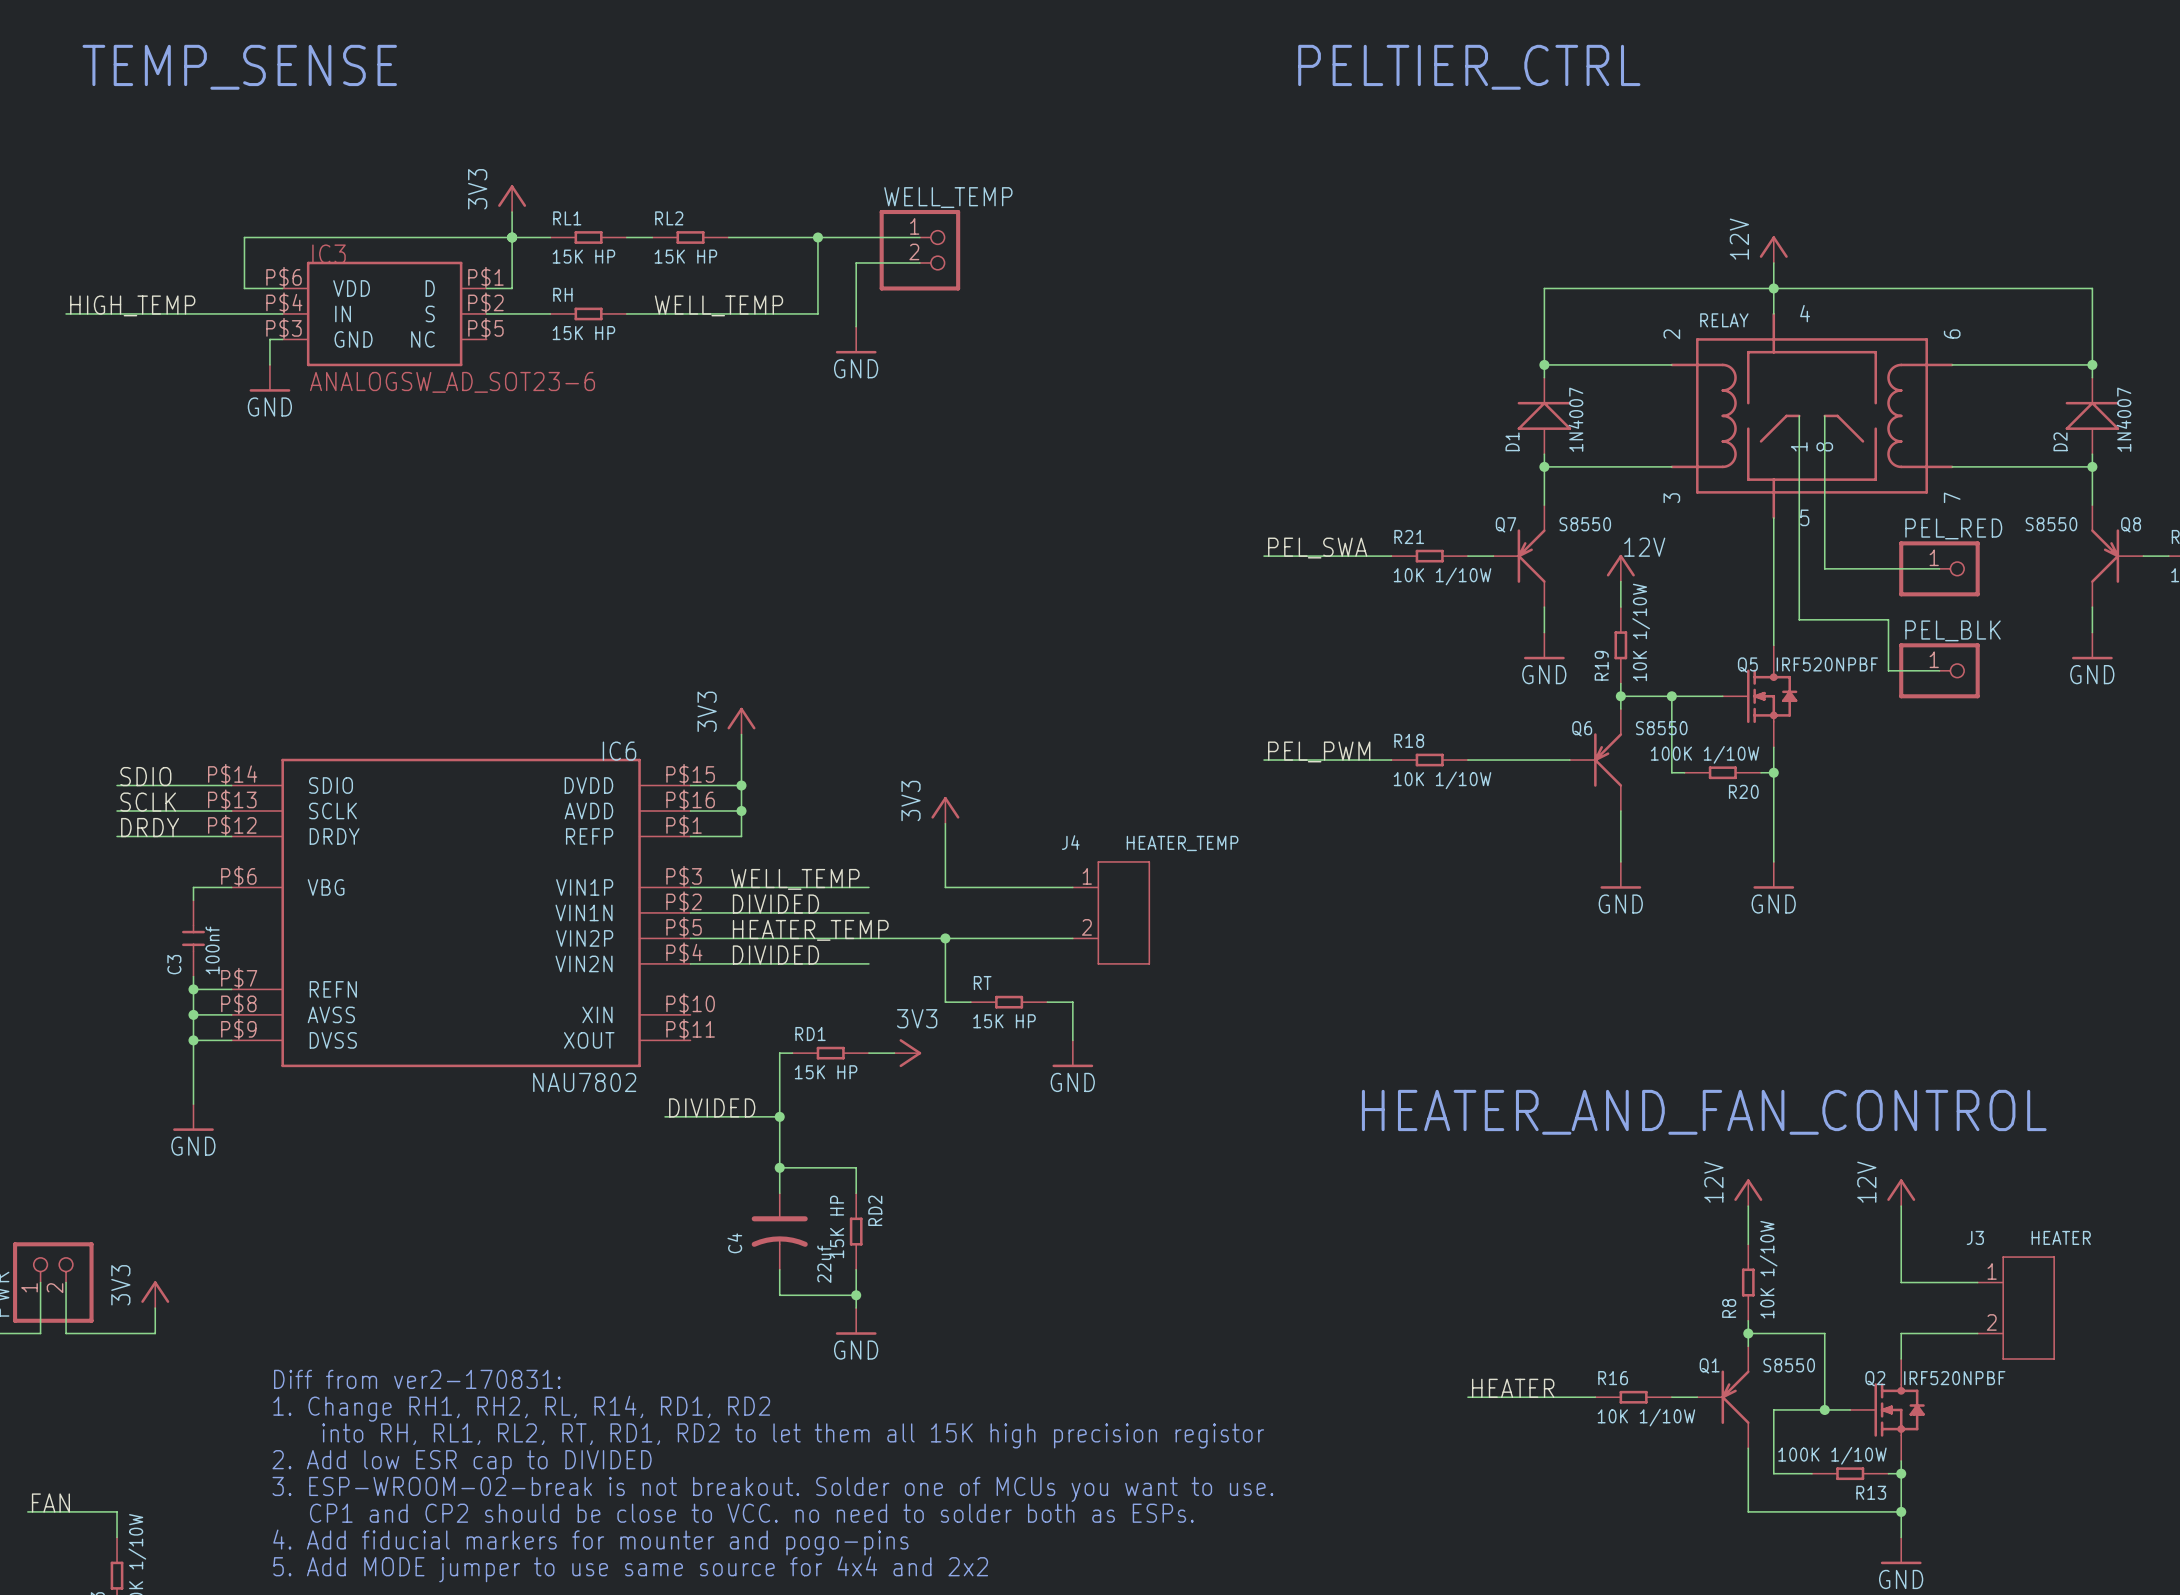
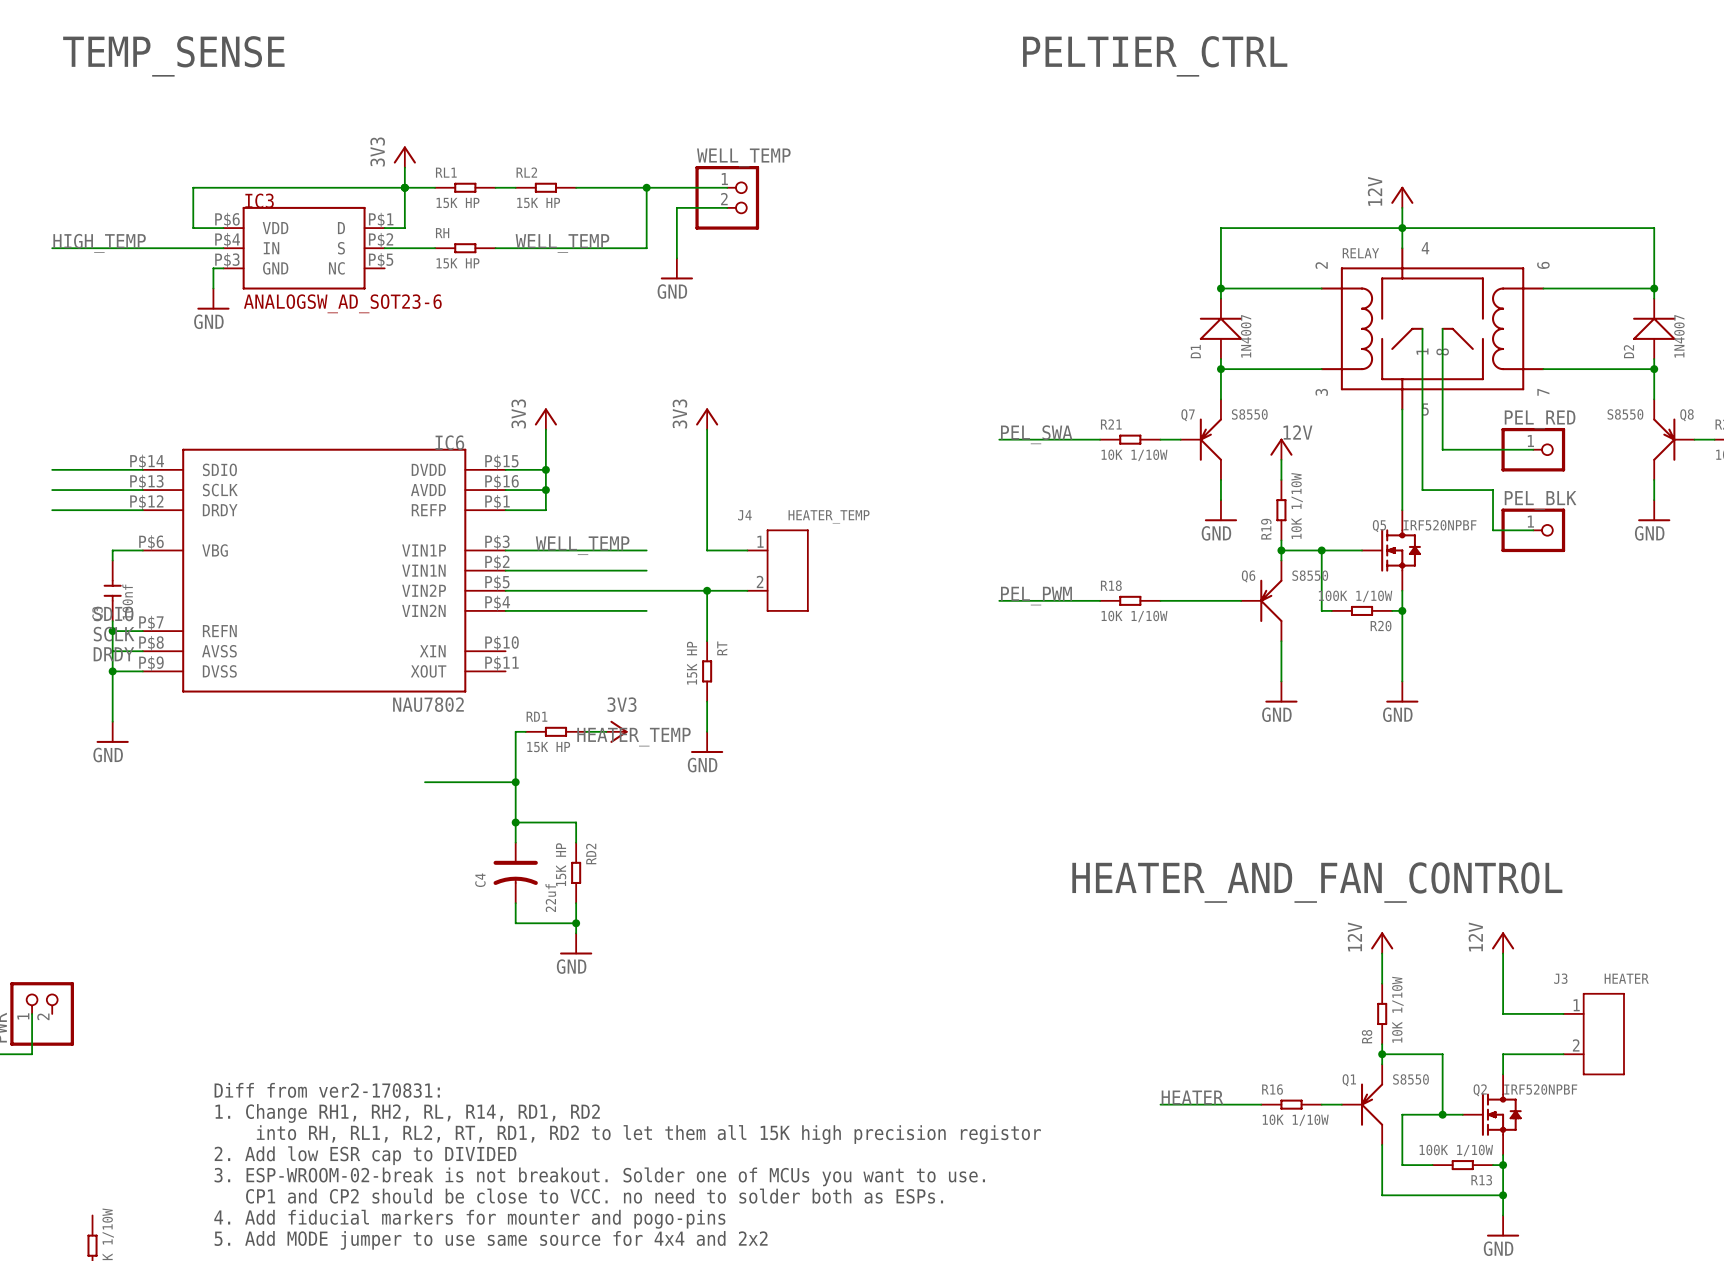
power symbol: none -> 3V3 (545, 419)
power symbol: none -> 3V3 (707, 419)
wire: none -> (707, 429) (707, 550) (747, 550)
junction: none -> (545, 469)
junction: none -> (545, 490)
power symbol: 3V3 (741, 721) -> none
wire: (741, 734) (741, 836) (690, 836) -> (545, 429) (545, 510) (505, 510)
wire: none -> (505, 590) (747, 590)
wire: none -> (707, 590) (707, 641)
junction: none -> (707, 590)
wire: (117, 785) (231, 785) -> (52, 469) (142, 469)
wire: (690, 785) (741, 785) -> (505, 469) (545, 469)
junction: (741, 785) -> none
junction: none -> (112, 631)
wire: (117, 810) (231, 810) -> (52, 490) (142, 490)
wire: (690, 810) (741, 810) -> (505, 490) (545, 490)
junction: (741, 810) -> none
power symbol: 3V3 (945, 810) -> none
wire: (945, 823) (945, 887) (1072, 887) -> none
wire: (117, 836) (231, 836) -> (52, 510) (142, 510)
junction: none -> (112, 671)
label position: WELL_TEMP (795, 879) -> WELL_TEMP (582, 545)
wire: (231, 887) (193, 887) (193, 900) -> (142, 550) (112, 550) (112, 560)
wire: (690, 887) (868, 887) -> (505, 550) (646, 550)
wire: none -> (707, 701) (707, 731)
label: DIVIDED (775, 904) -> none
IC6 position: (461, 912) -> (324, 570)
wire: (690, 912) (868, 912) -> (505, 570) (646, 570)
J4 position: (1111, 912) -> (777, 570)
power symbol: none -> 3V3 (616, 731)
C3 position: (193, 938) -> (112, 590)
wire: (690, 938) (1072, 938) -> none
wire: (945, 938) (945, 1002) (970, 1002) -> none
junction: (945, 938) -> none
power symbol: none -> GND (707, 742)
label: DIVIDED (775, 955) -> none
wire: (690, 963) (868, 963) -> (505, 610) (646, 610)
wire: (193, 976) (193, 1104) -> (112, 621) (112, 721)
wire: (193, 989) (231, 989) -> (112, 631) (142, 631)
junction: (193, 989) -> none
junction: none -> (515, 782)
RT rotation: 0° (1009, 1002) -> 90° clockwise (707, 671)
RT position: (1009, 1002) -> (707, 671)
wire: (1047, 1002) (1072, 1002) (1072, 1040) -> none
wire: (193, 1014) (231, 1014) -> (112, 651) (142, 651)
junction: (193, 1014) -> none
wire: (193, 1040) (231, 1040) -> (112, 671) (142, 671)
junction: (193, 1040) -> none
junction: none -> (515, 822)
wire: (792, 1053) (779, 1053) (779, 1193) -> (525, 731) (515, 731) (515, 842)
RD1 position: (830, 1053) -> (555, 731)
wire: (868, 1053) (894, 1053) -> (586, 731) (606, 731)
power symbol: 3V3 (907, 1053) -> none
power symbol: GND (1072, 1053) -> none
label: DIVIDED (712, 1107) -> none
wire: (665, 1116) (779, 1116) -> (425, 782) (515, 782)
junction: (779, 1116) -> none
power symbol position: GND (193, 1117) -> GND (112, 732)
junction: none -> (576, 923)
wire: (779, 1167) (856, 1167) (856, 1193) -> (515, 822) (576, 822) (576, 842)
junction: (779, 1167) -> none
C4 position: (779, 1231) -> (515, 872)
RD2 position: (856, 1231) -> (576, 872)
wire: (779, 1269) (779, 1295) (856, 1295) -> (515, 903) (515, 923) (576, 923)
wire: (856, 1269) (856, 1308) -> (576, 903) (576, 933)
wire: (66, 1282) (66, 1333) (155, 1333) (155, 1308) -> none
power symbol: 3V3 (155, 1294) -> none
junction: (856, 1295) -> none
power symbol position: GND (856, 1321) -> GND (576, 943)
label: FAN (50, 1503) -> none
wire: (27, 1511) (117, 1511) (117, 1537) -> none

